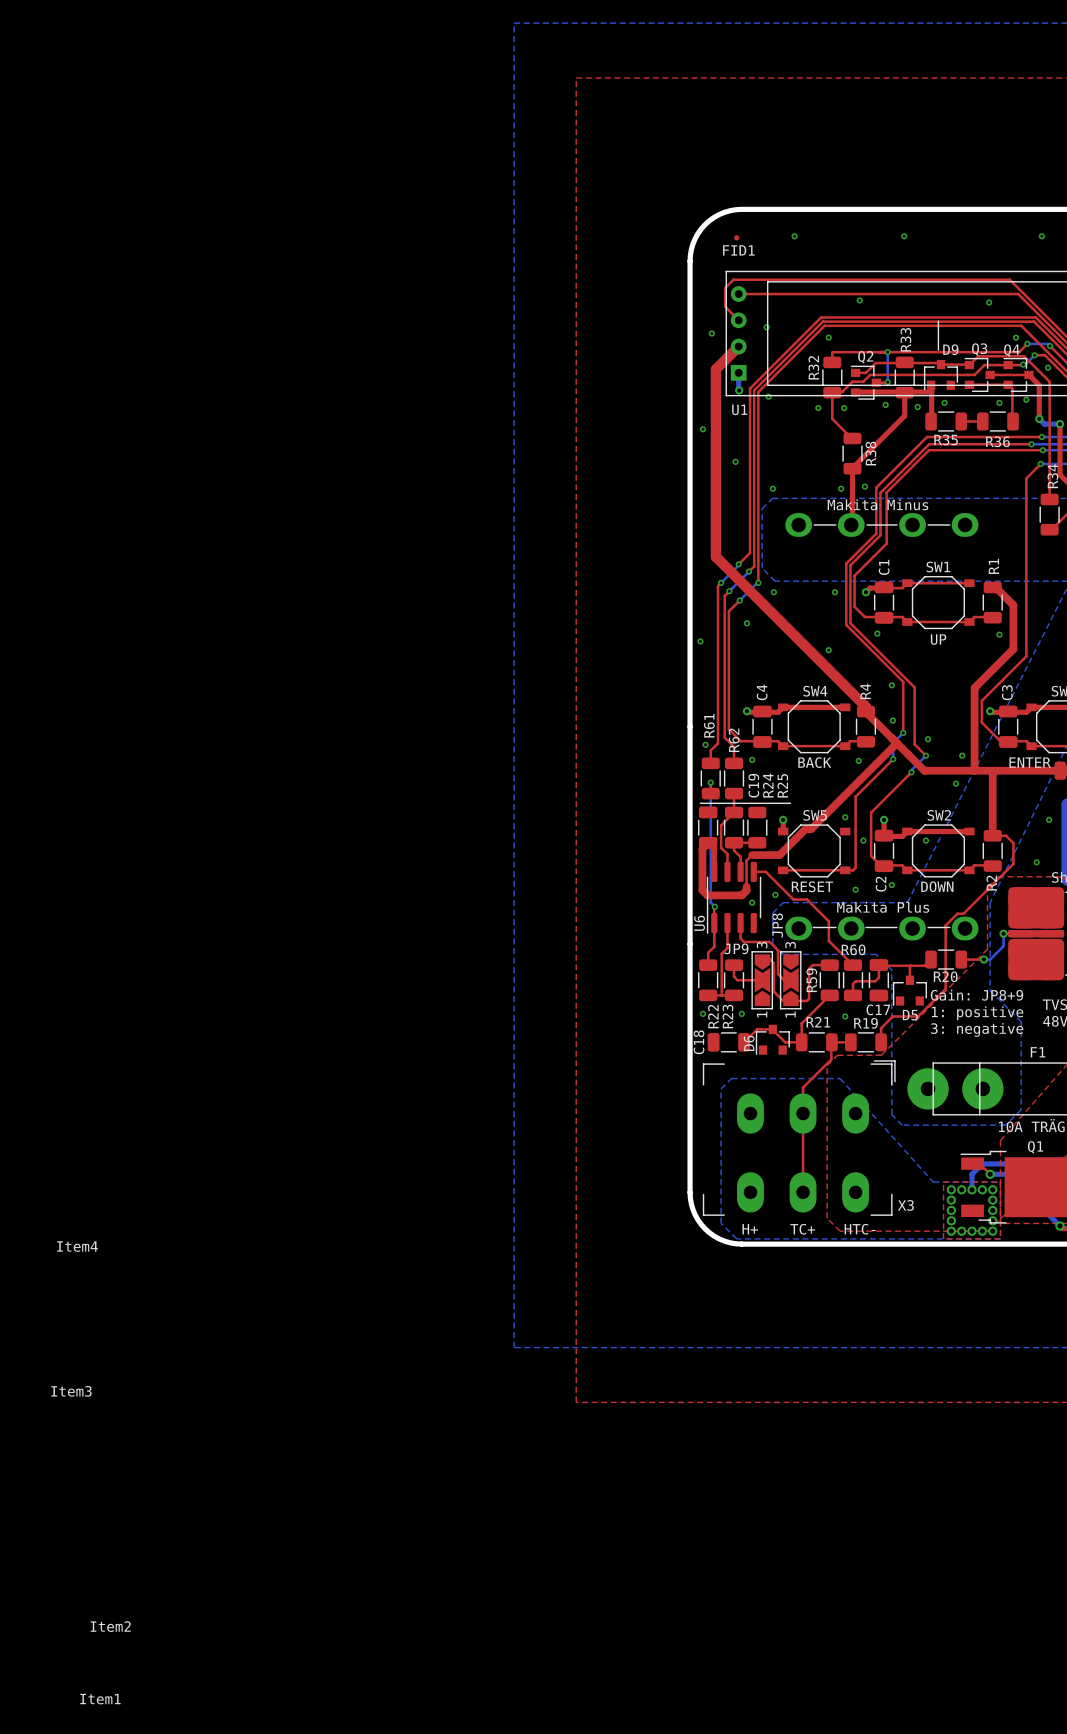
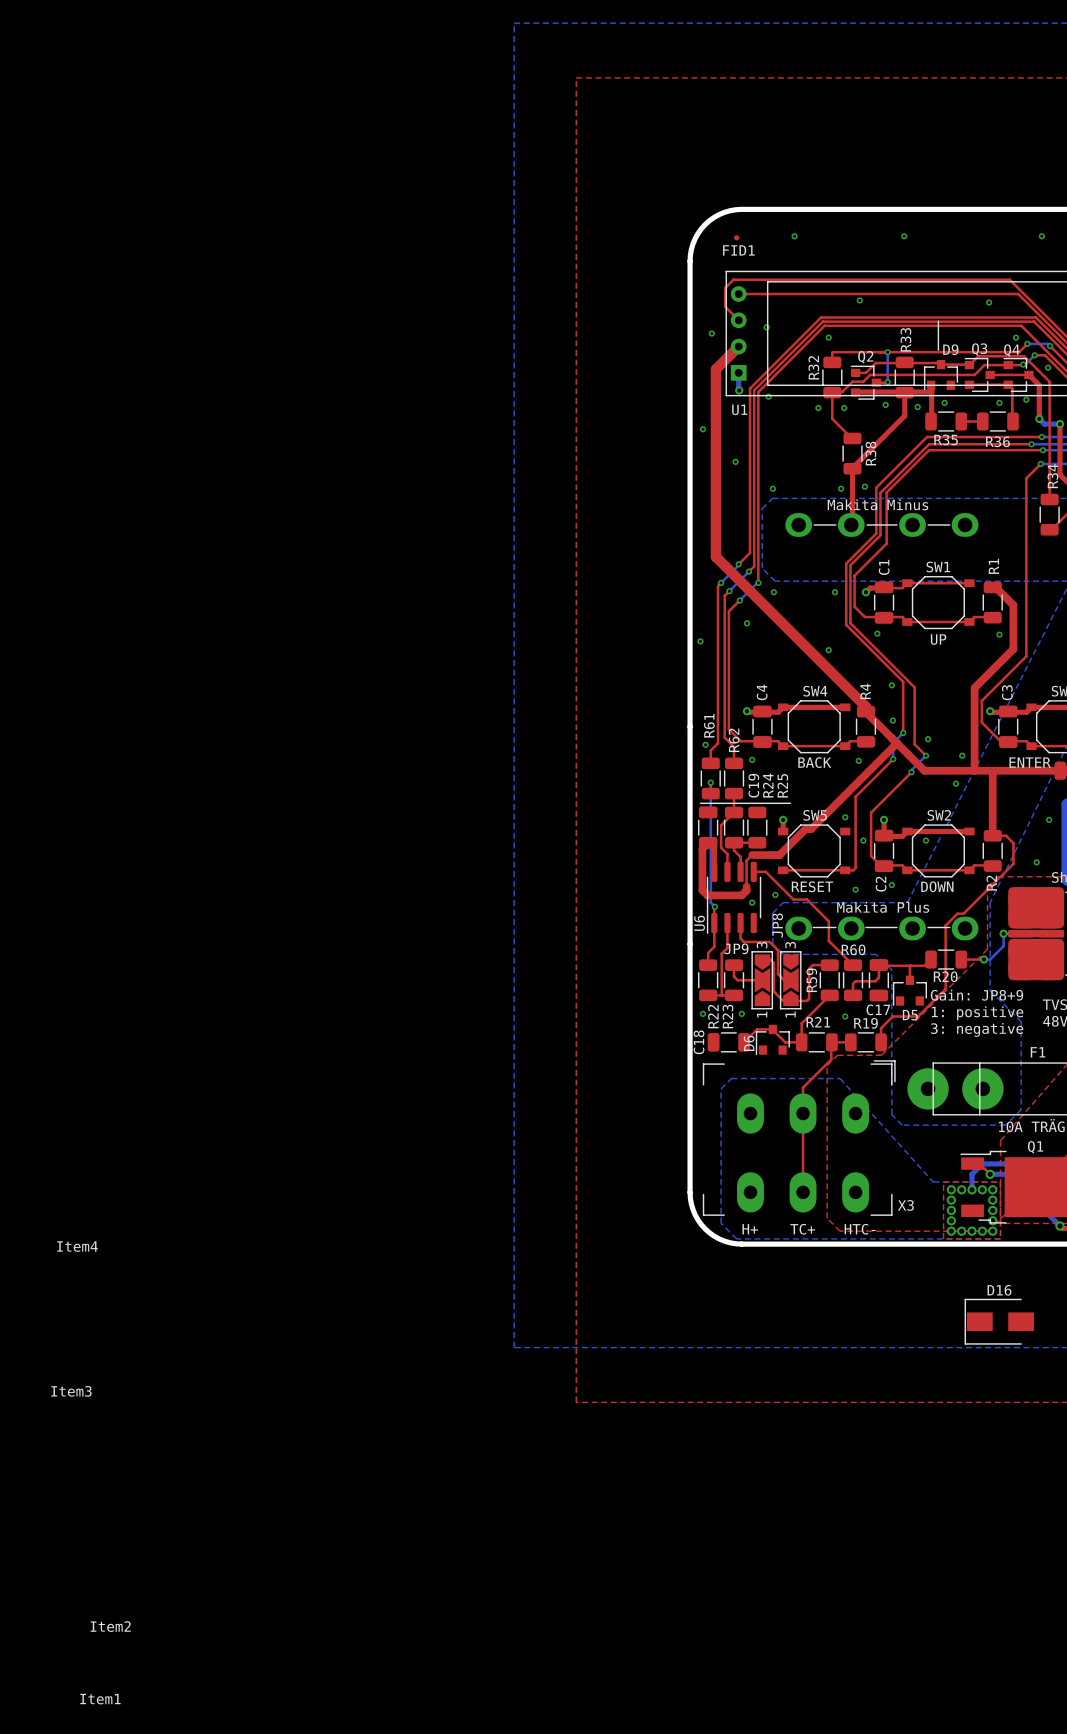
D16: none -> (999, 1321)

